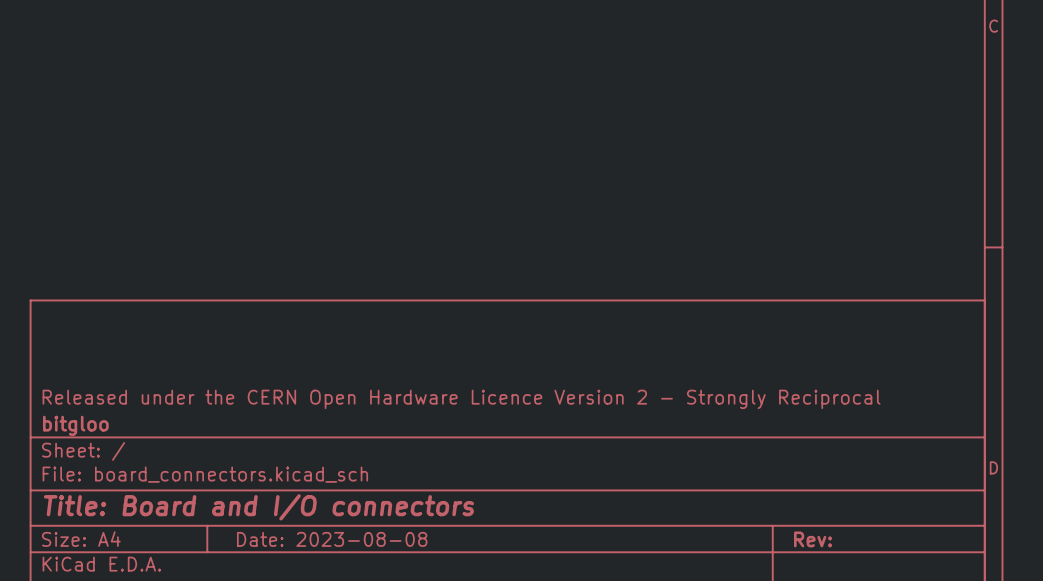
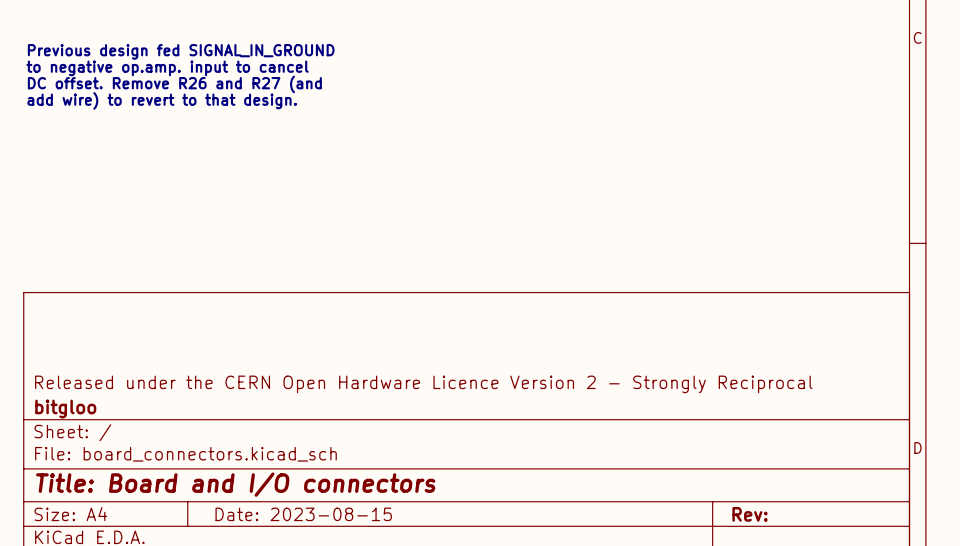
text: none -> Previous design fed SIGNAL_IN_GROUND (181, 51)
text: none -> to negative op.amp. input to cancel (167, 68)
text: none -> DC offset. Remove R26 and R27 (and (174, 84)
text: none -> add wire) to revert to that design. (162, 100)
title block: Date: 2023-08-08 (332, 539) -> Date: 2023-08-15 (303, 514)

